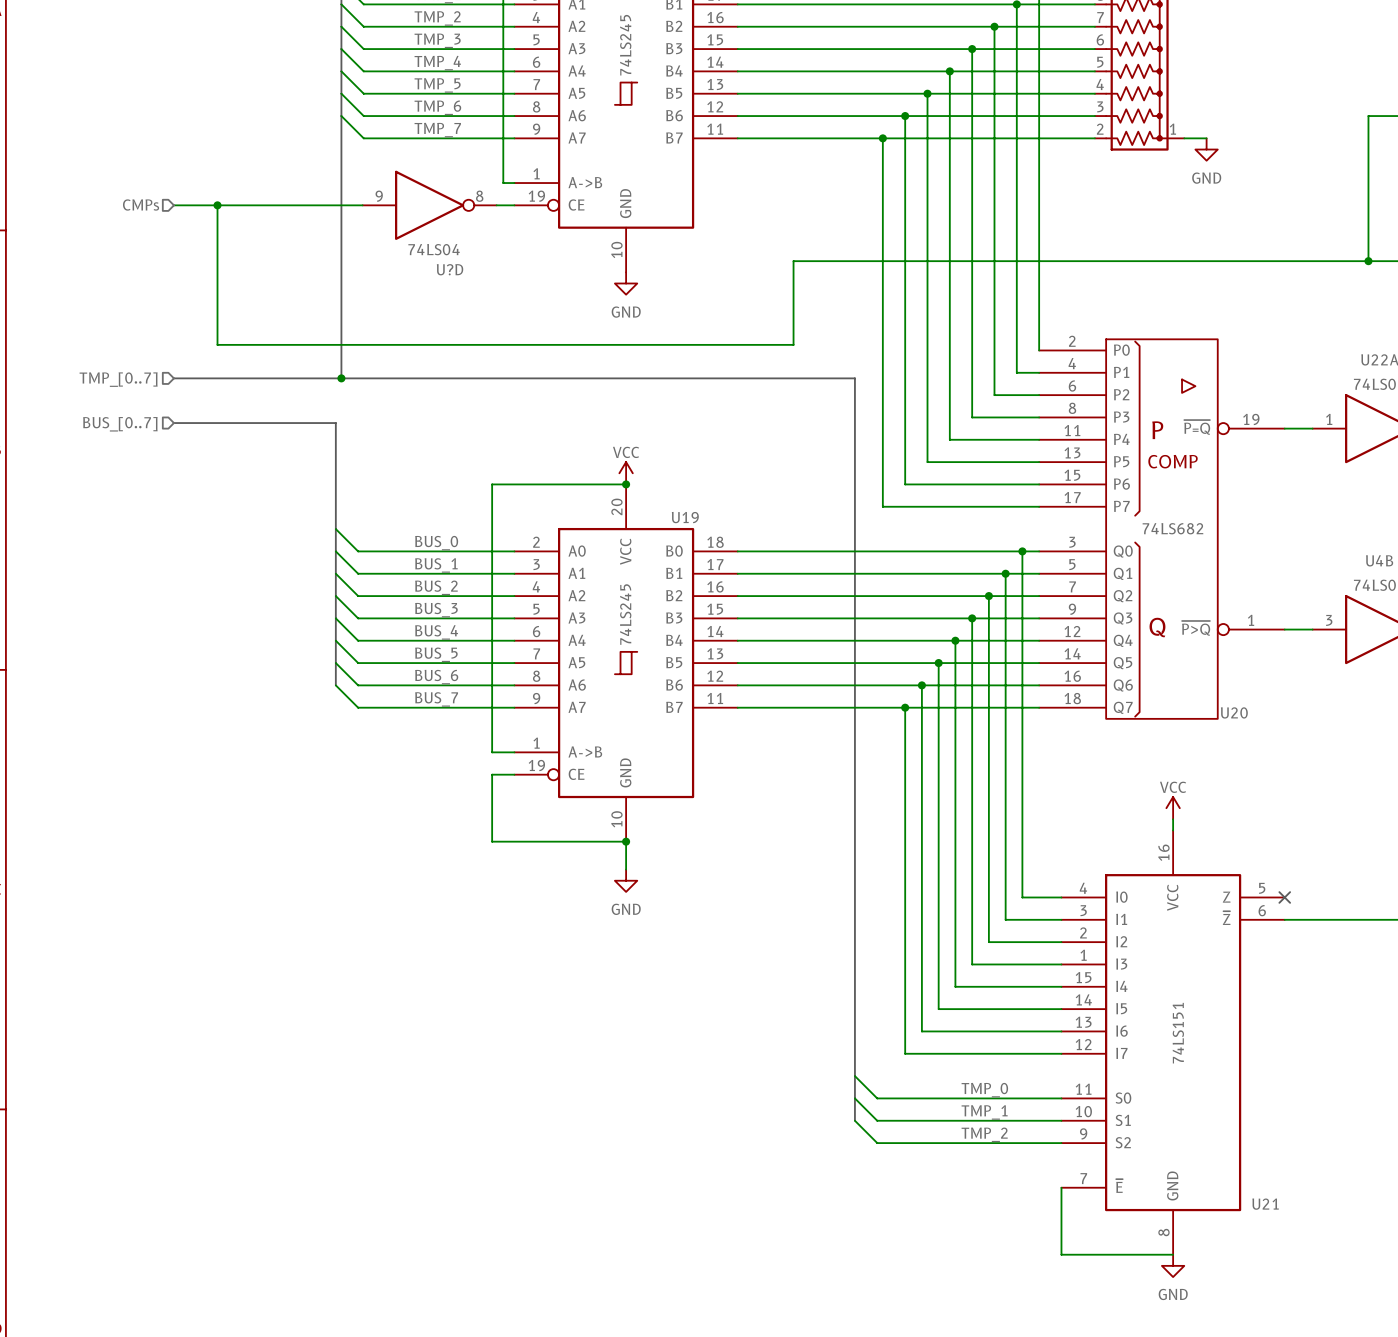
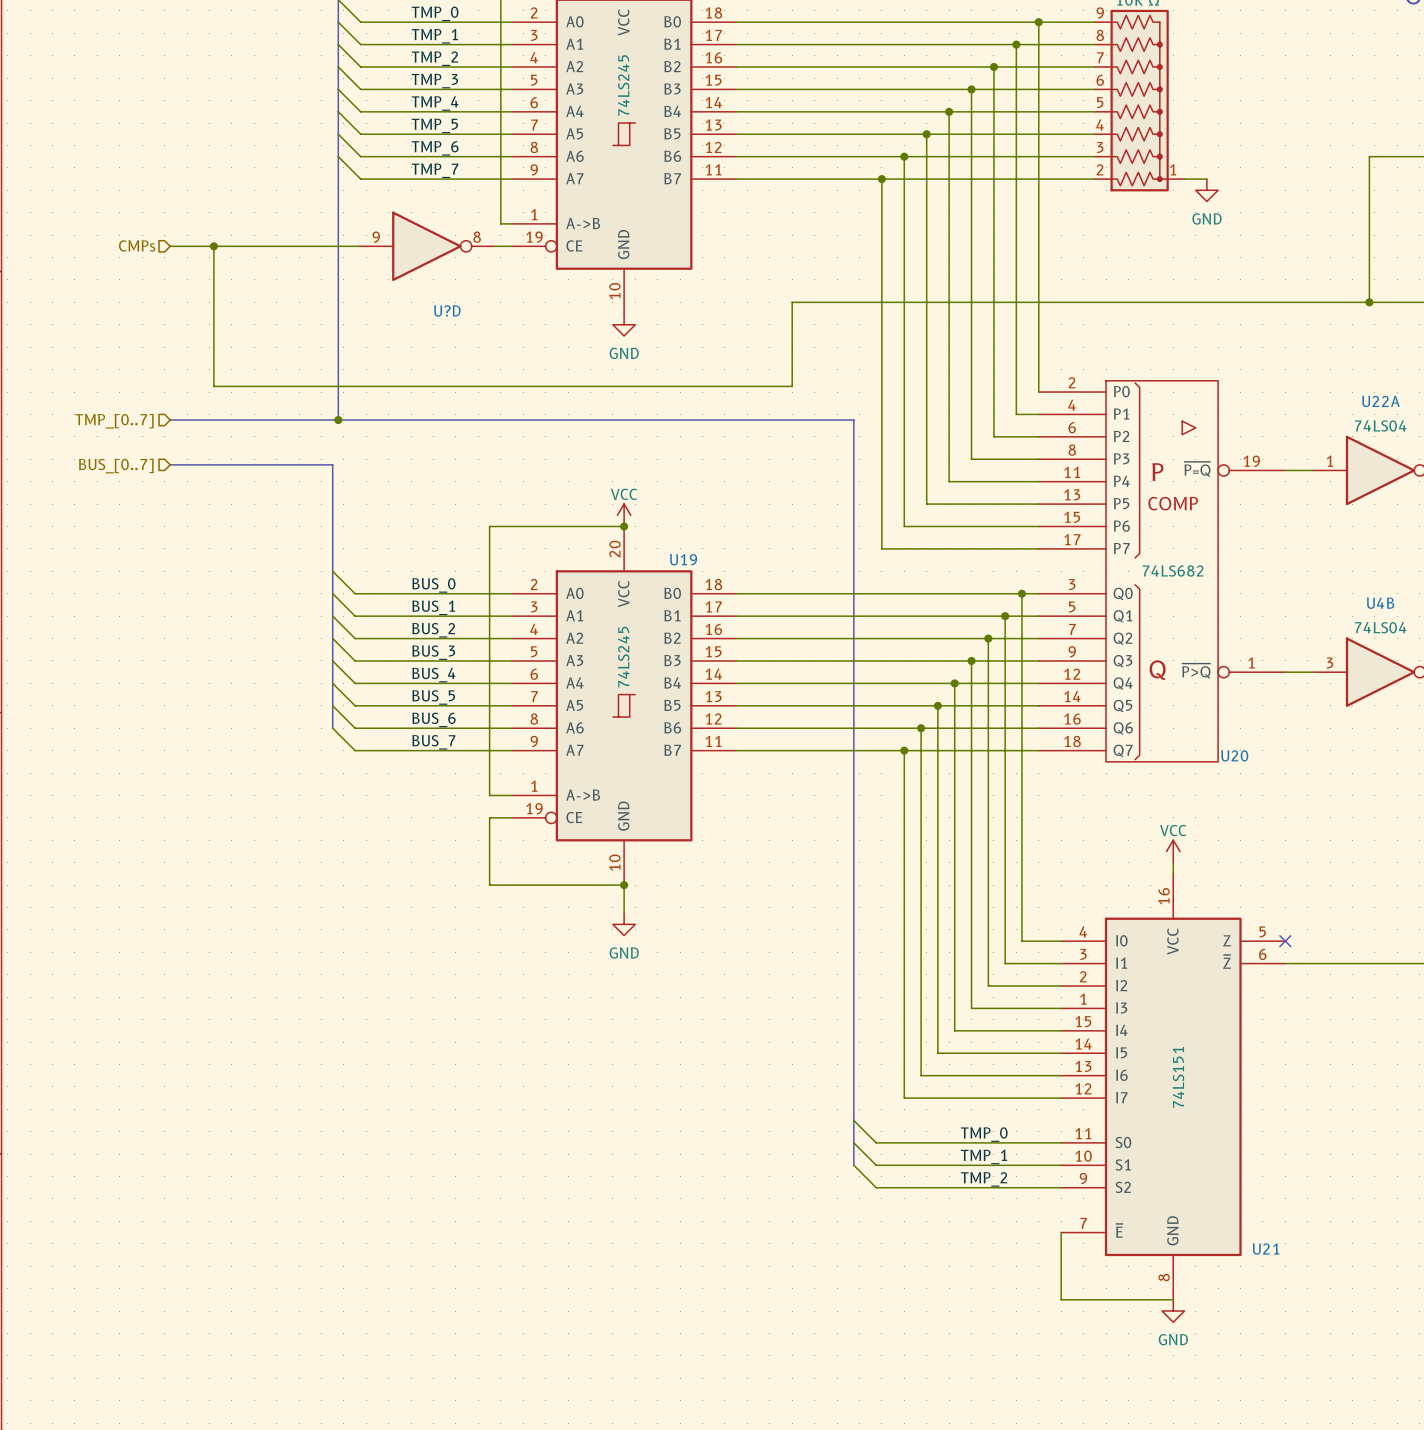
U?D value: 74LS04 (434, 249) -> none

